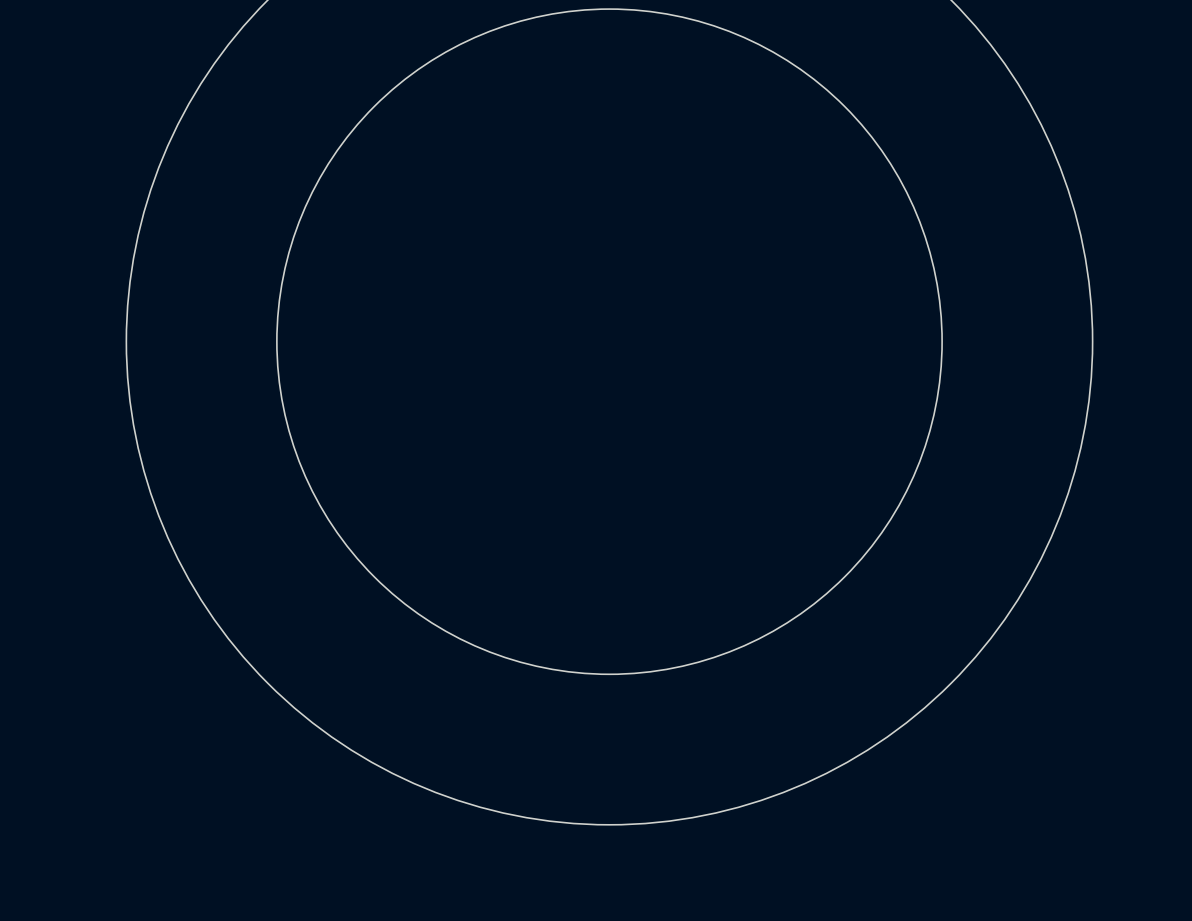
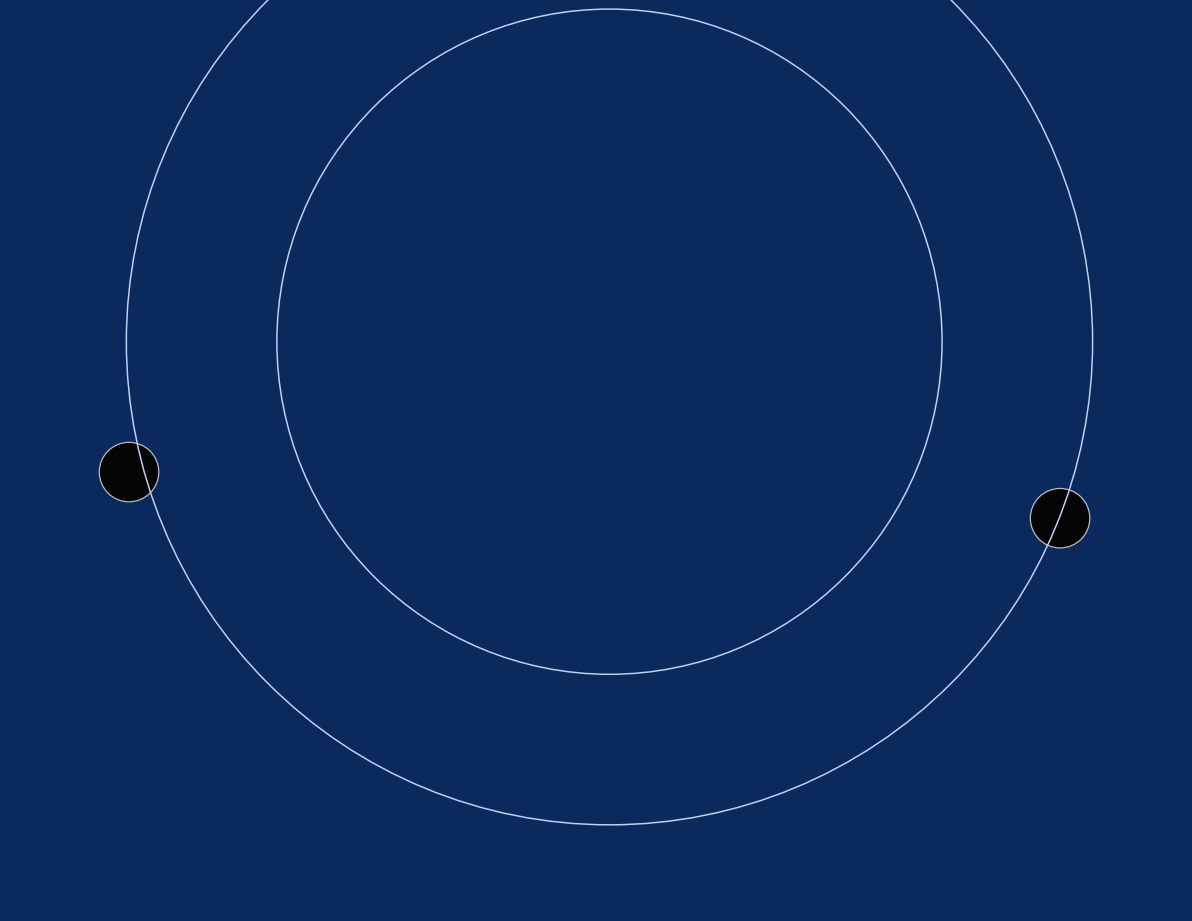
via: none -> (129, 472)
via: none -> (1060, 518)

